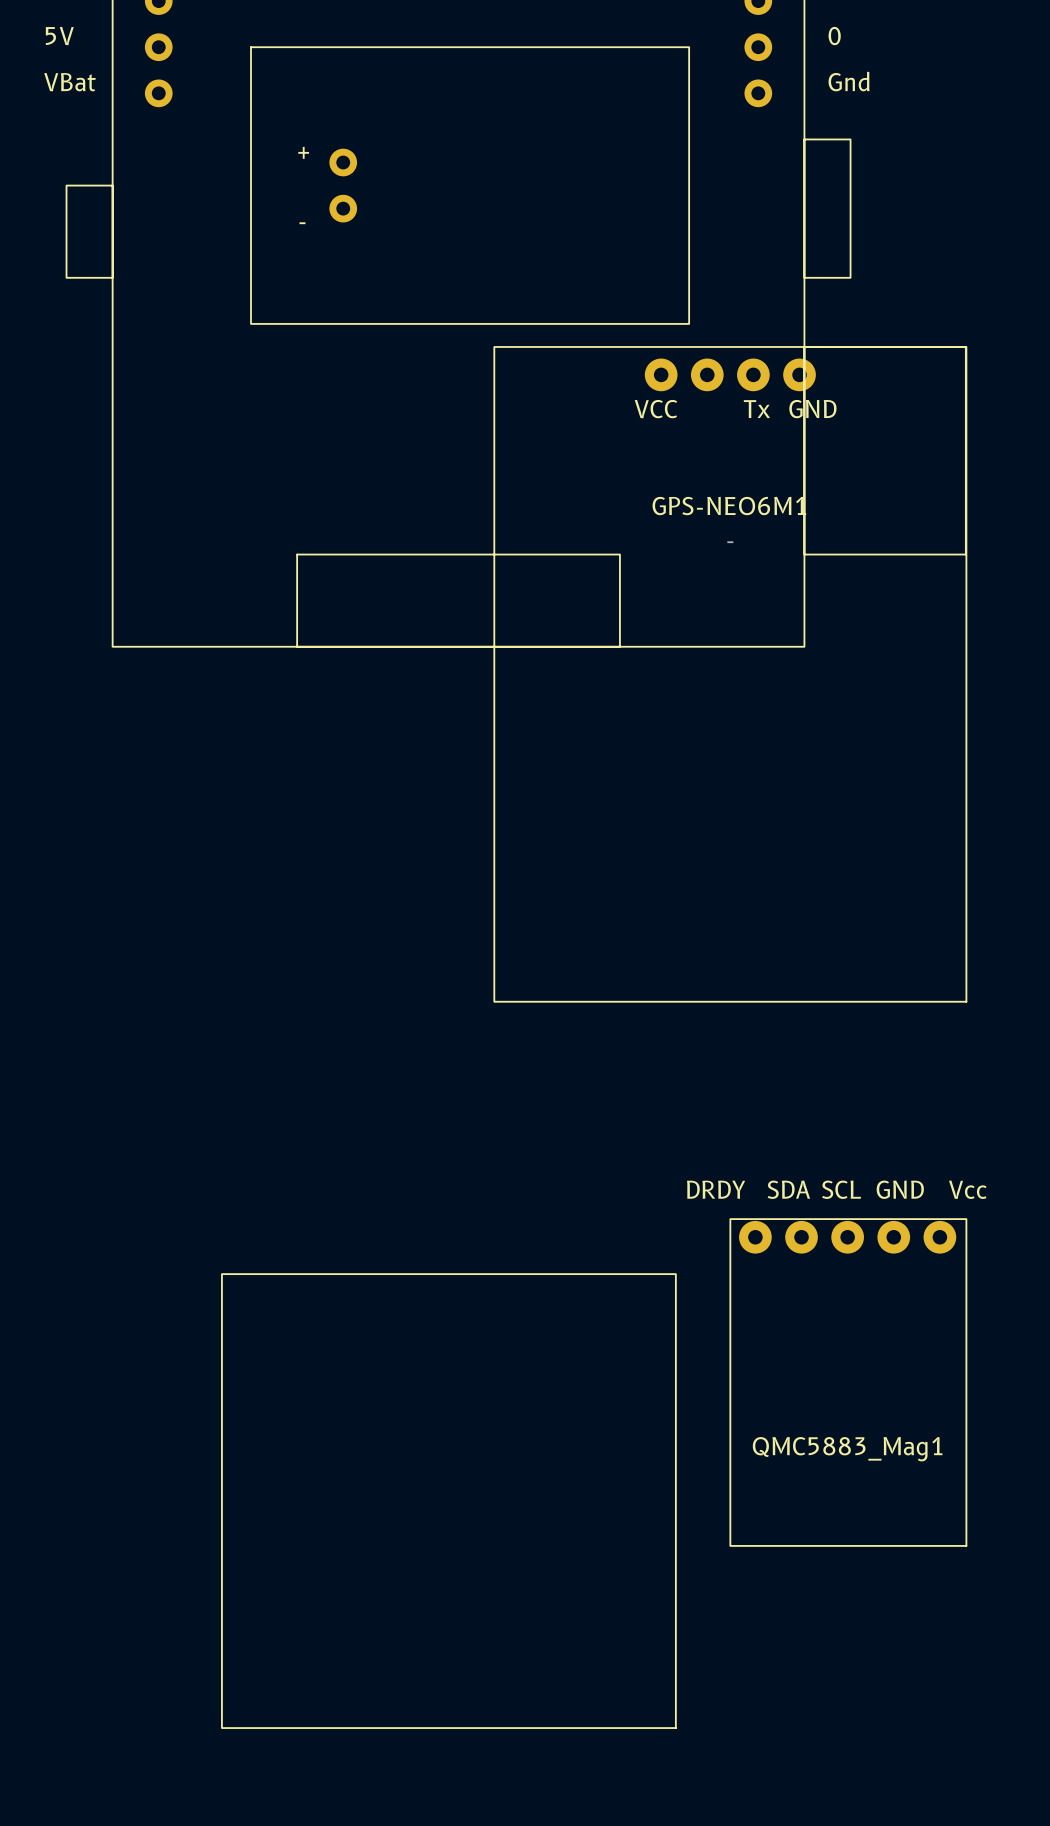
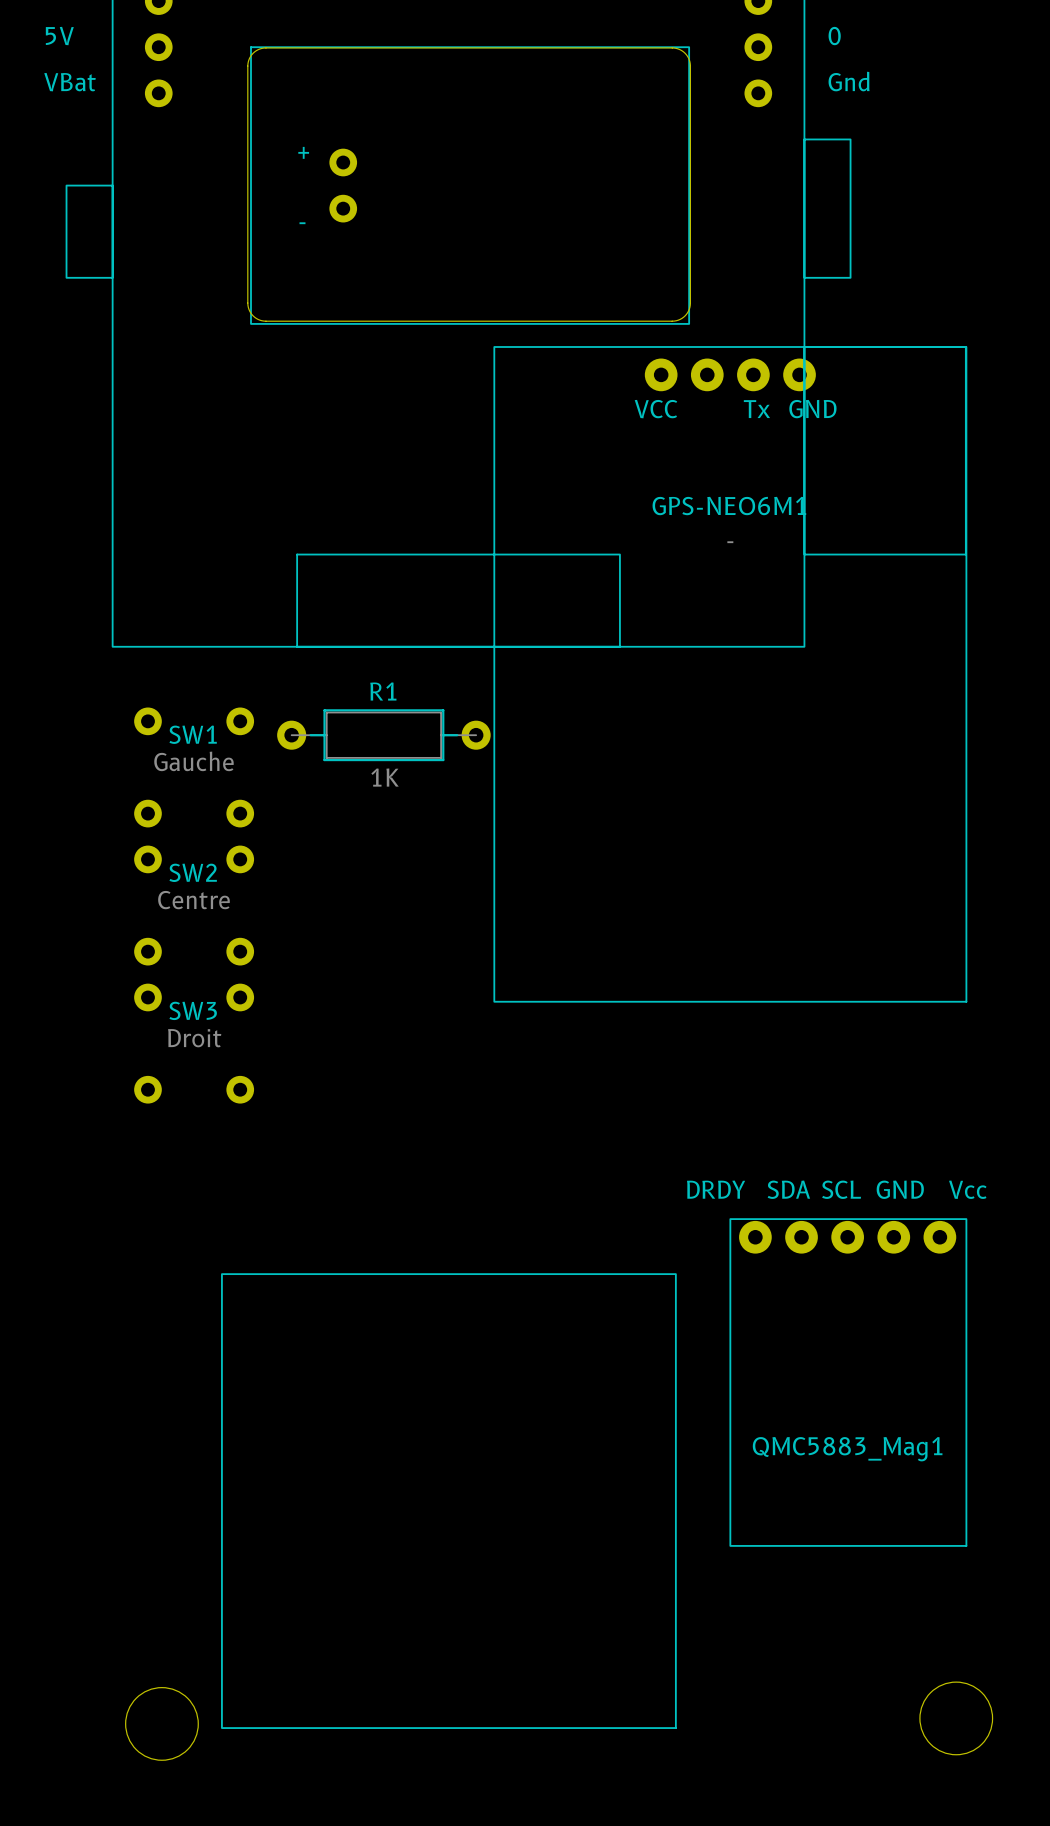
board edge: none -> (265, 47) (672, 47) (681, 50) (687, 56) (690, 66) (690, 303) (687, 312) (680, 319) (672, 321) (265, 321) (256, 318) (249, 310) (247, 303) (247, 66) (253, 53) (265, 47)
R1: none -> 1K (383, 735)
SW1: none -> Gauche (194, 767)
SW2: none -> Centre (194, 905)
SW3: none -> Droit (194, 1043)
round board edge: none -> [919, 1681, 994, 1756]
round board edge: none -> [125, 1687, 199, 1761]

